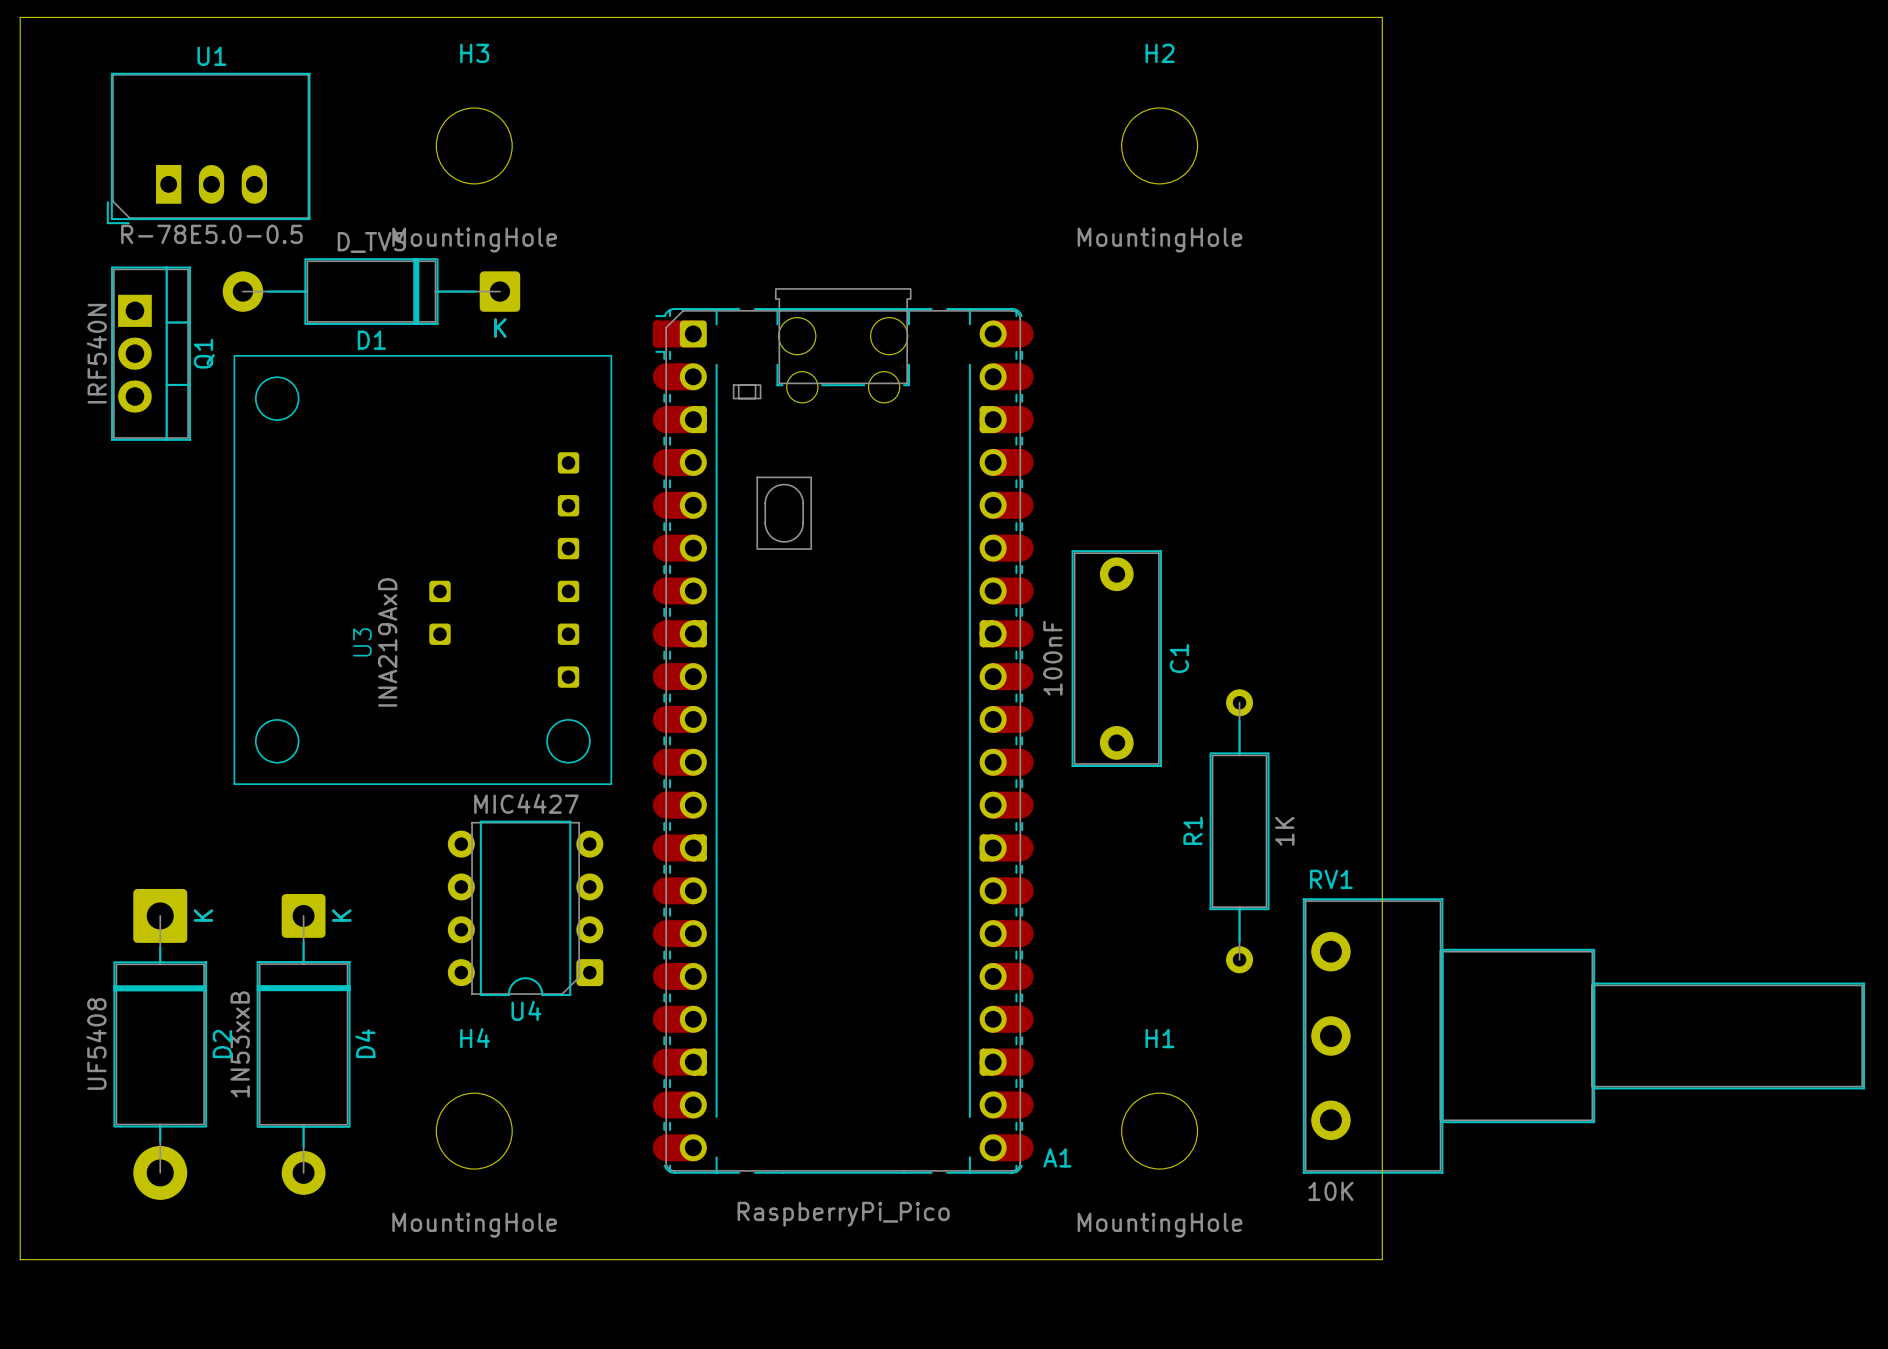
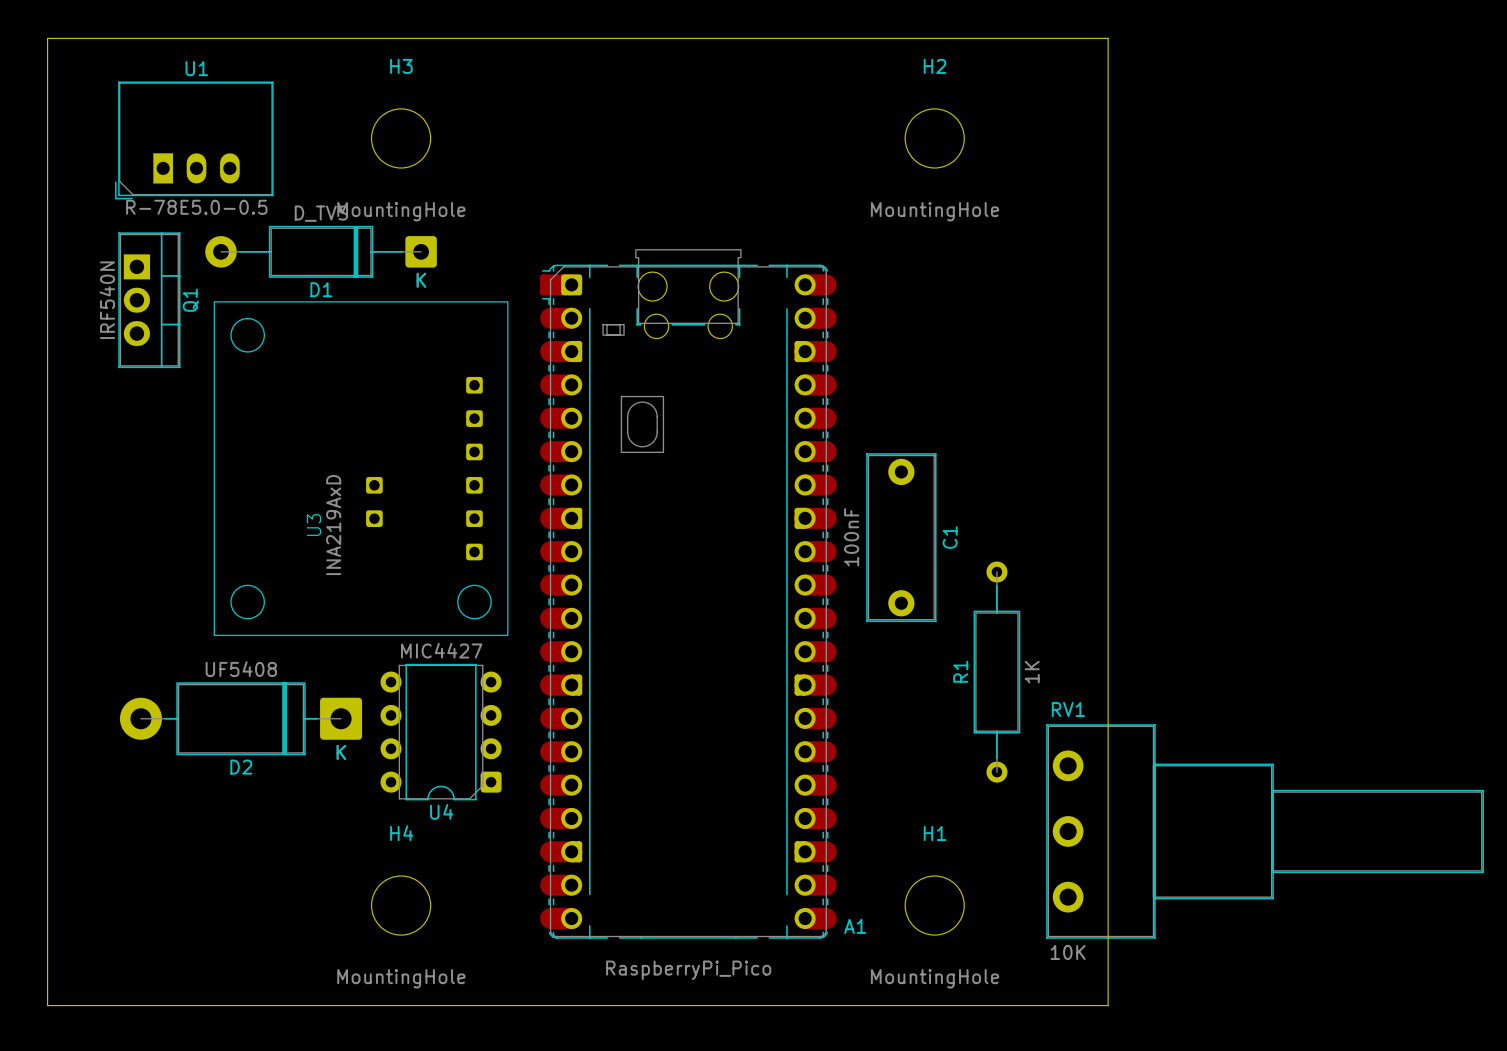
D2 rotation: 0° (160, 1044) -> 90° clockwise (241, 718)
D2 position: (160, 1044) -> (241, 718)
D4: 1N53xxB (303, 1044) -> none

